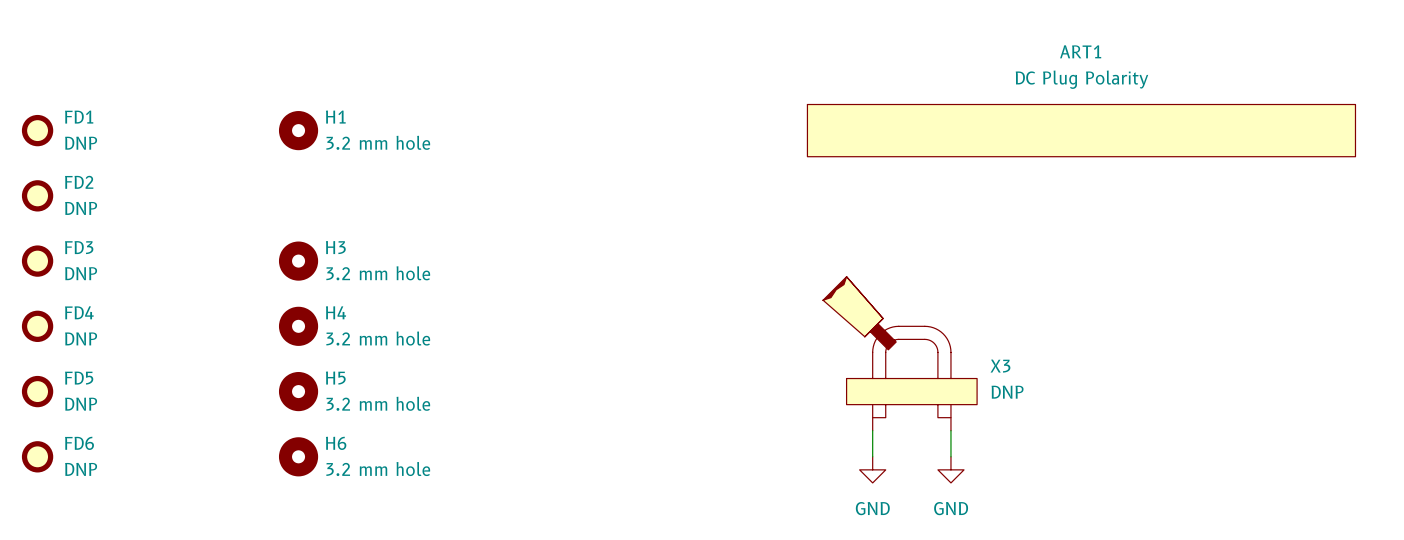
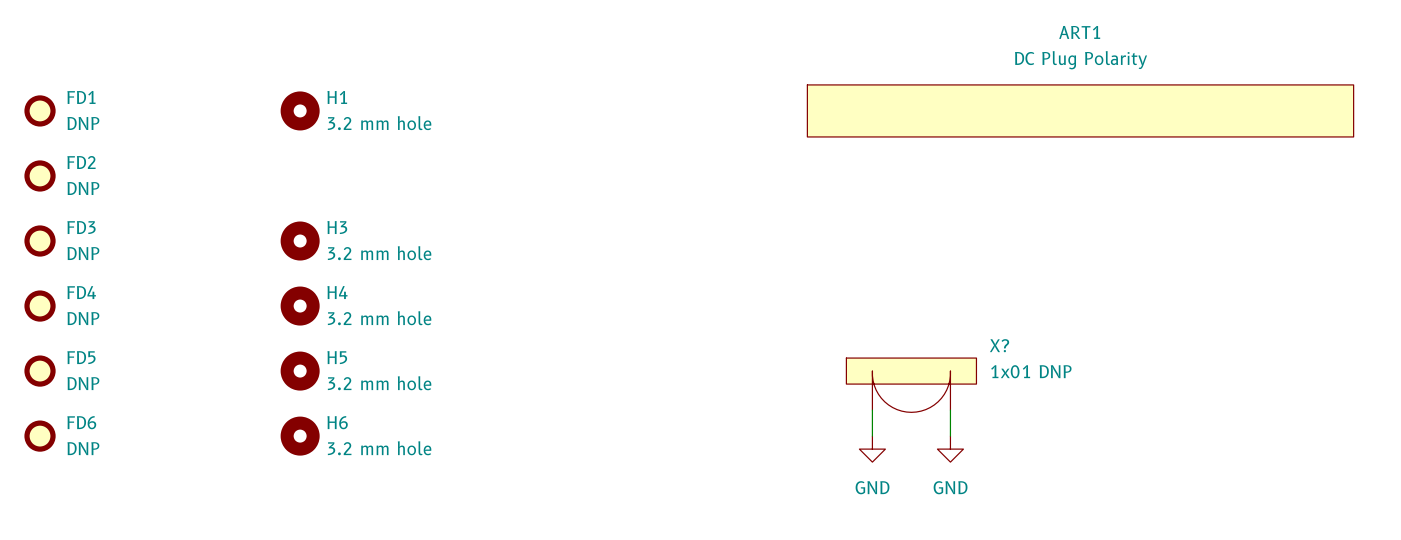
X3: (900, 353) -> none
X?: none -> (911, 385)

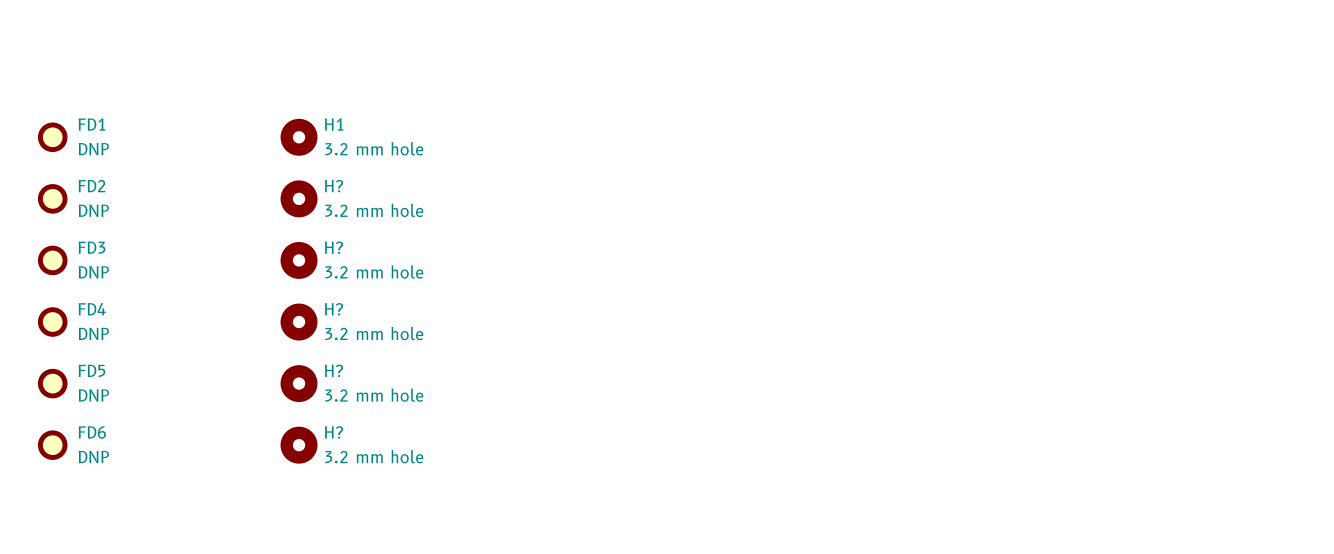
ART1: (1080, 110) -> none
H?: none -> (299, 198)
H3 name: H3 (337, 227) -> H? (333, 247)
H4 name: H4 (337, 292) -> H? (333, 309)
H5 name: H5 (337, 357) -> H? (333, 370)
X?: (911, 385) -> none
wire: (872, 410) (872, 436) -> none
wire: (950, 410) (950, 436) -> none
H6 name: H6 (337, 422) -> H? (333, 432)
power symbol: GND (872, 449) -> none
power symbol: GND (950, 449) -> none

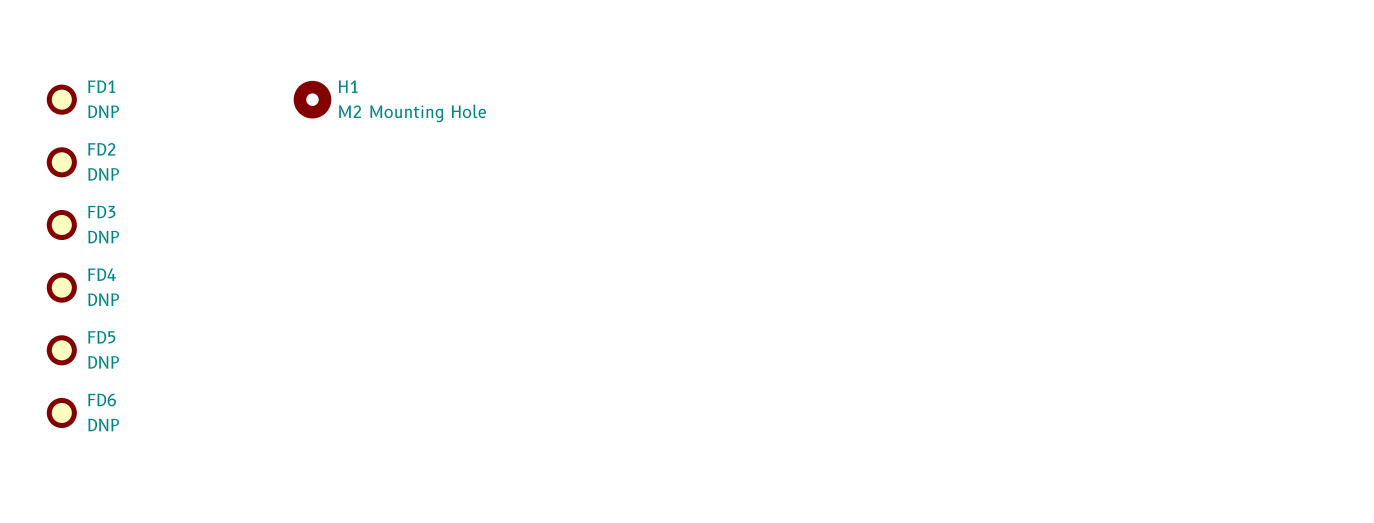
H1 text: 3.2 mm hole (374, 148) -> M2 Mounting Hole (412, 113)
H?: (299, 198) -> none
H?: (299, 260) -> none
H?: (299, 322) -> none
H?: (299, 383) -> none
H?: (299, 445) -> none

